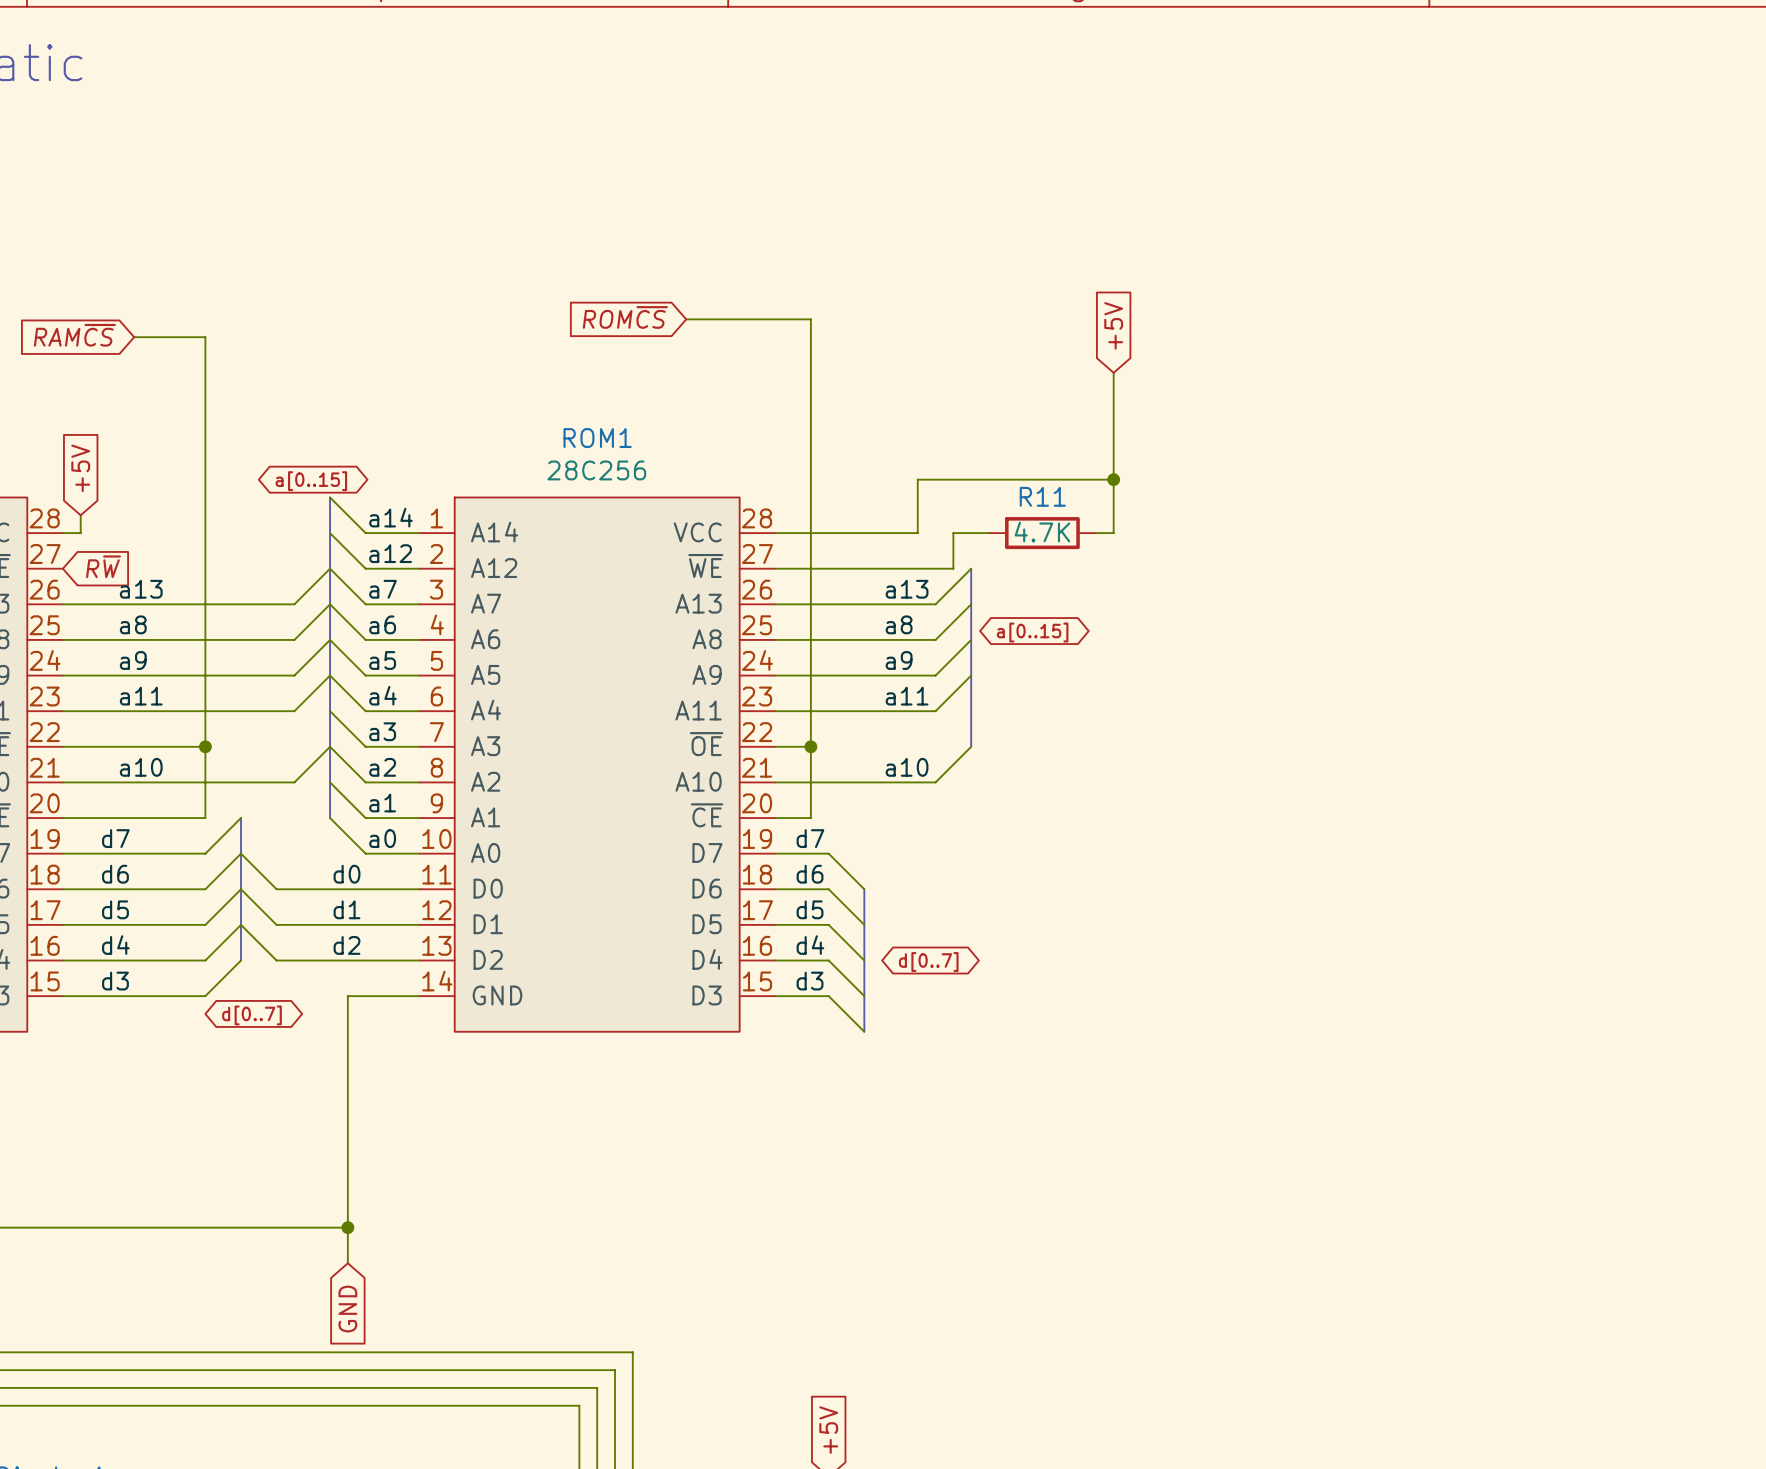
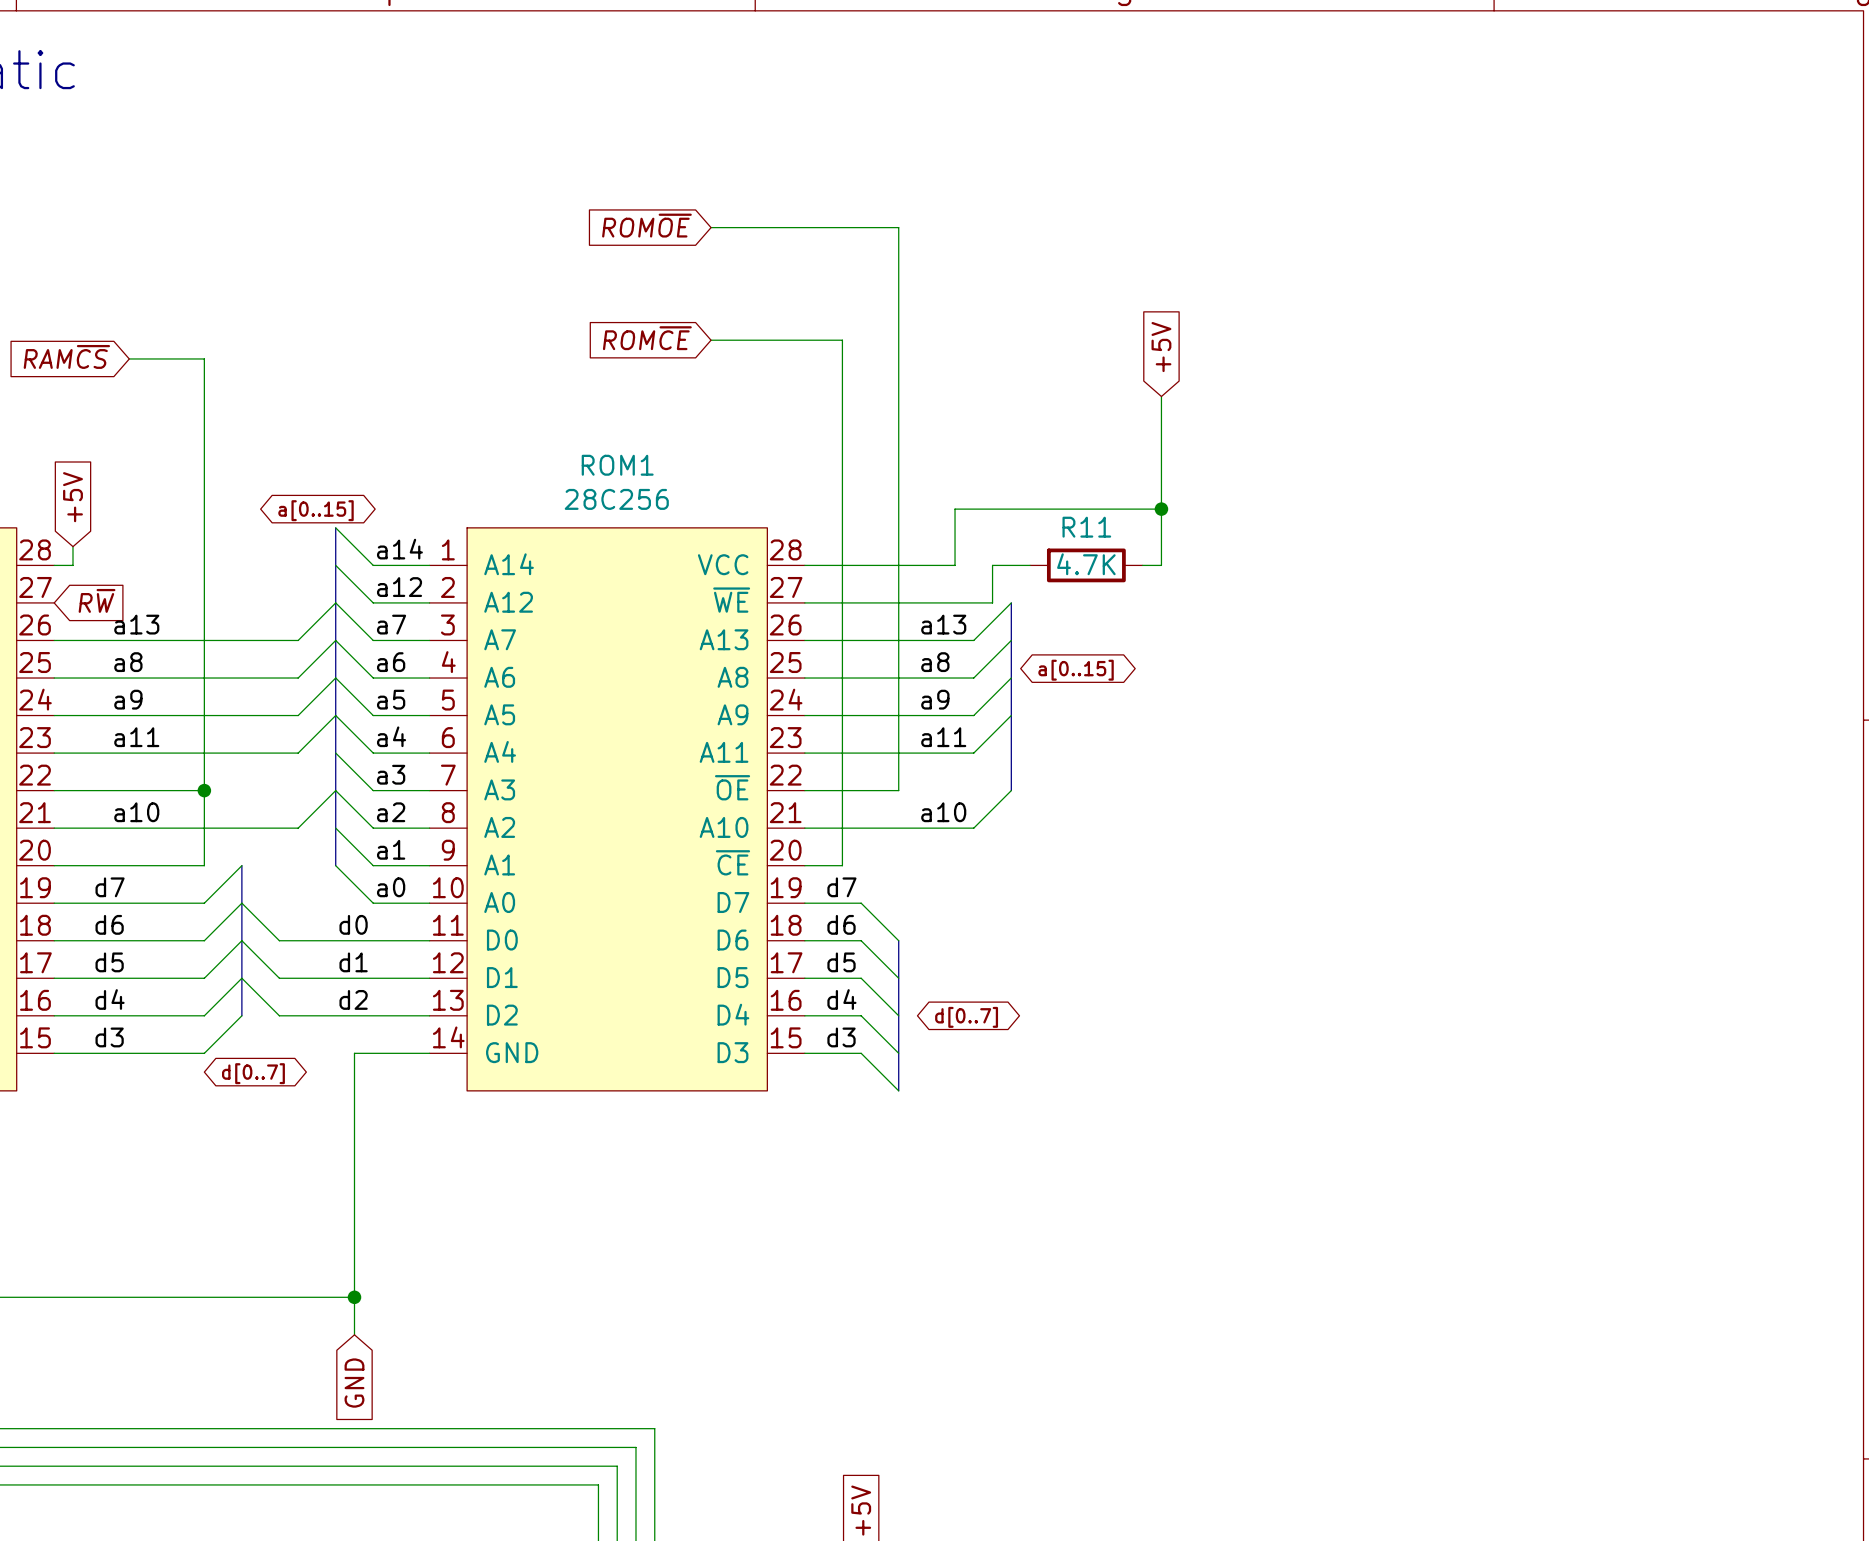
global label: none -> ROM~{OE} (646, 225)
wire: none -> (711, 227) (898, 227) (898, 790) (842, 790)
global label: ROM~{CS} (625, 317) -> ROM~{CE} (647, 338)
junction: (810, 746) -> none

